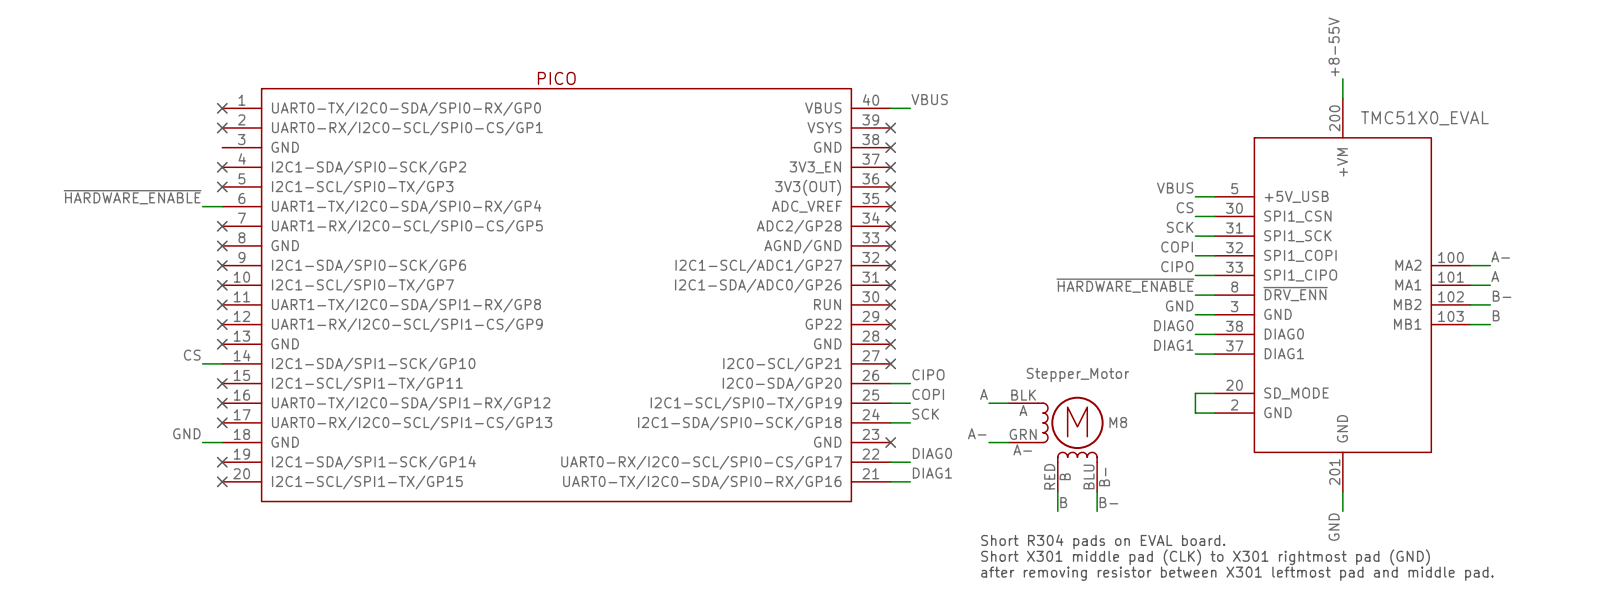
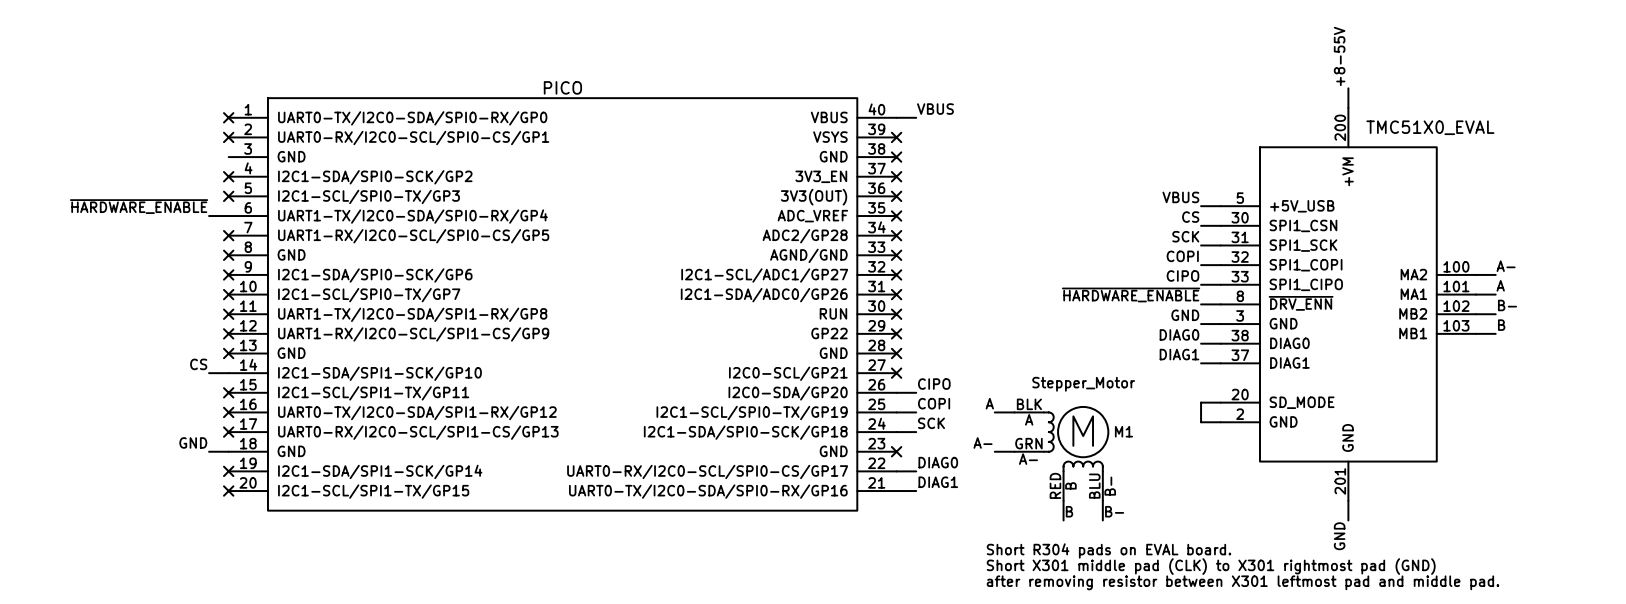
M8 name: M8 (1118, 422) -> M1 (1123, 431)

